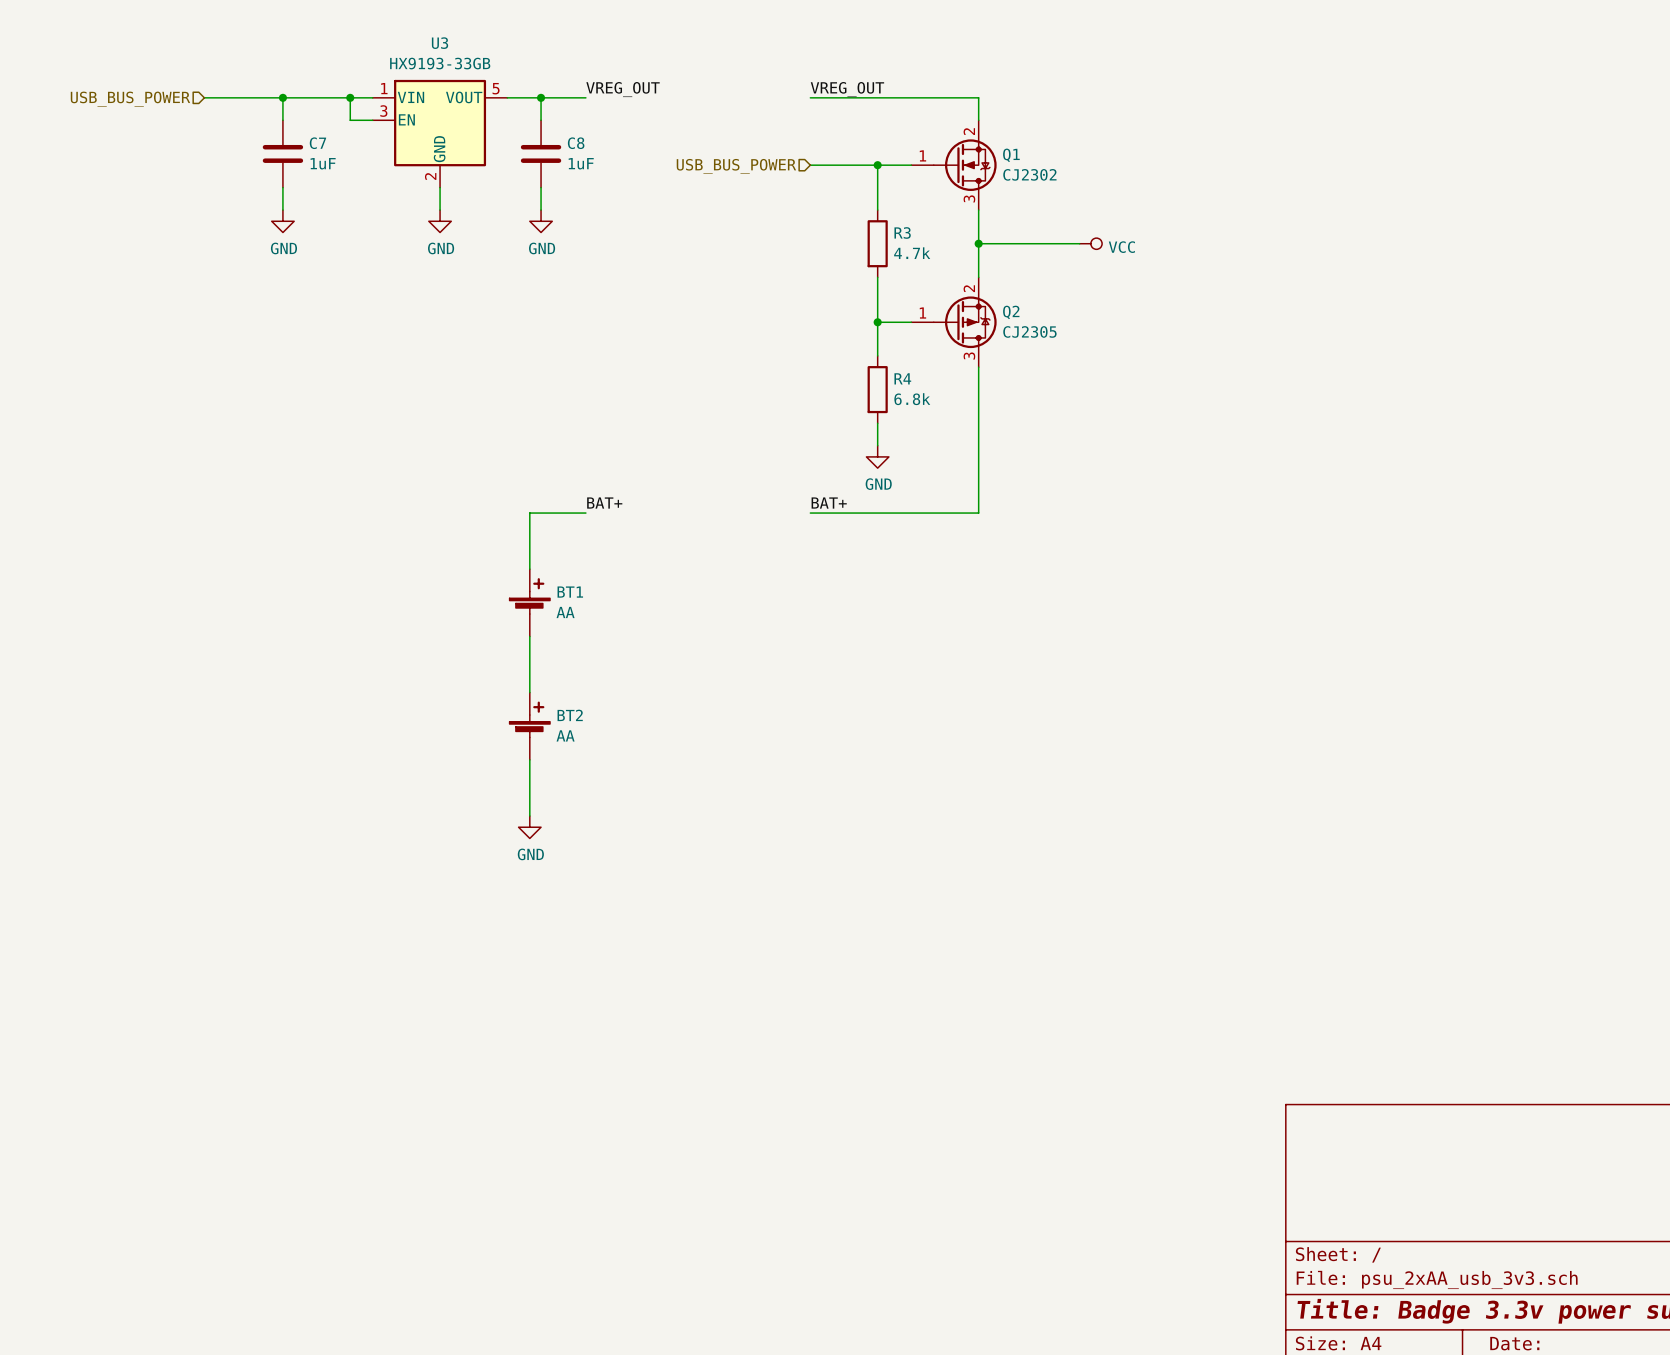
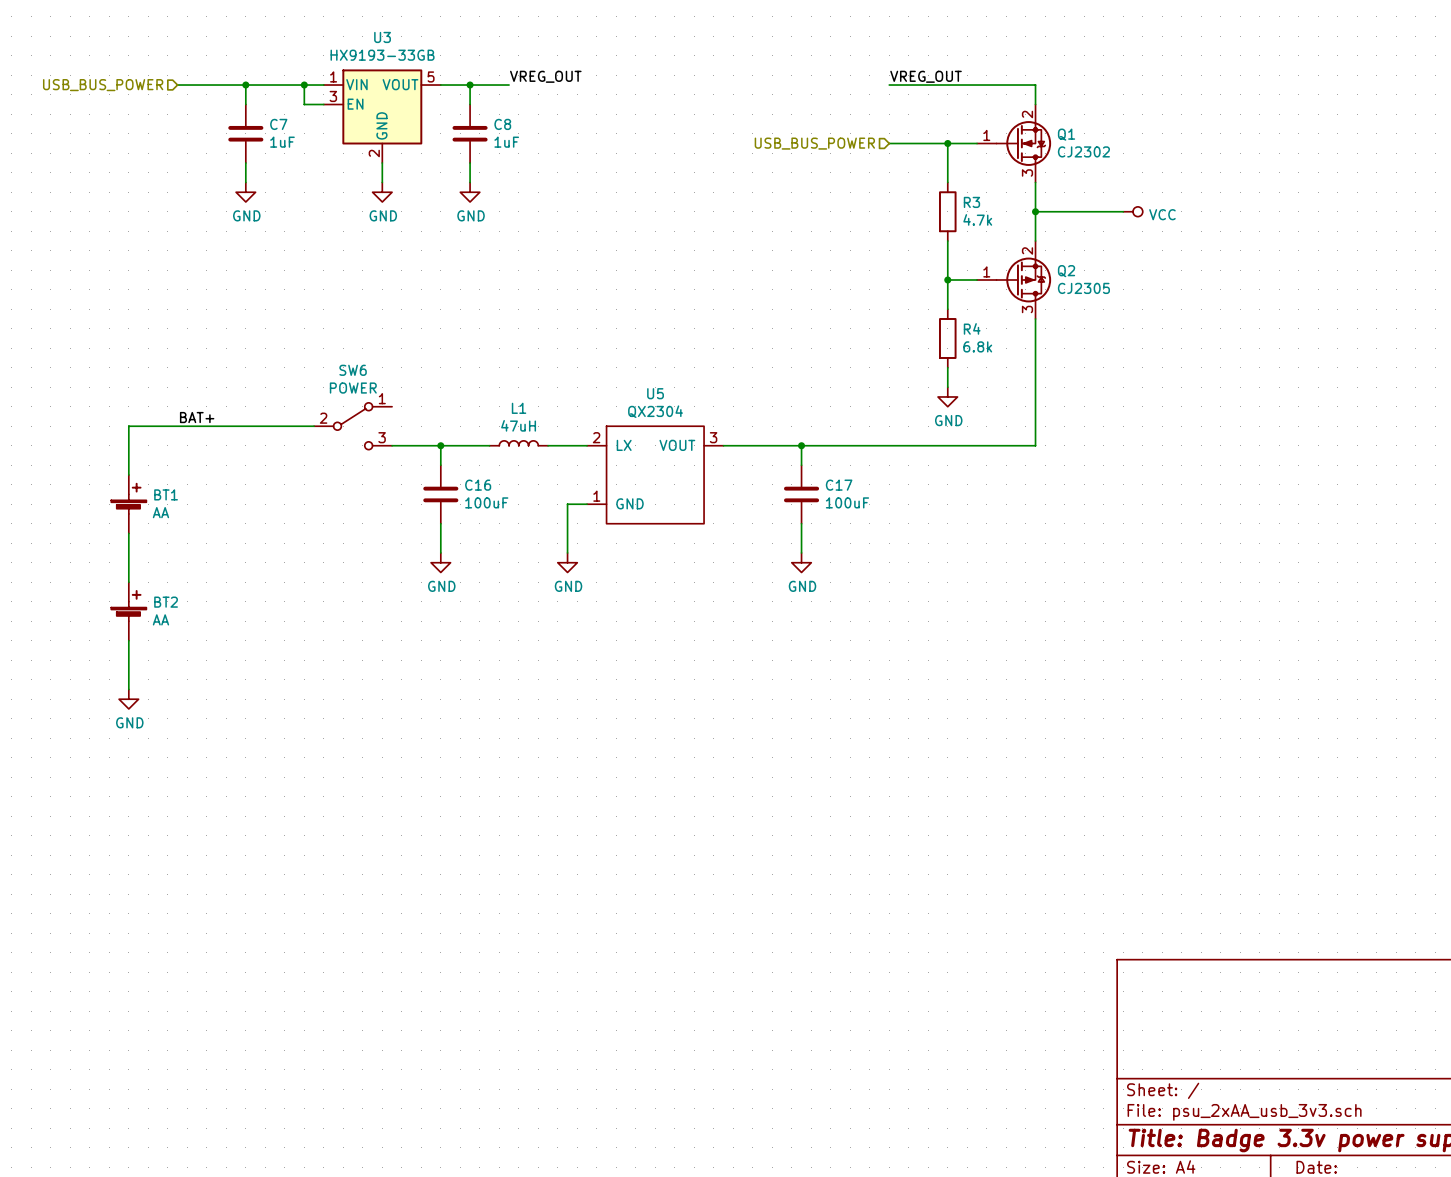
label position: VREG_OUT (847, 89) -> VREG_OUT (926, 76)
wire: (810, 97) (978, 97) (978, 120) -> (889, 85) (1035, 85) (1035, 104)
wire: (810, 165) (911, 165) -> (889, 143) (977, 143)
wire: (877, 165) (877, 210) -> (947, 143) (947, 182)
junction: (877, 165) -> none
Q1 position: (953, 165) -> (1014, 143)
junction: none -> (947, 143)
hierarchical label position: USB_BUS_POWER (736, 166) -> USB_BUS_POWER (814, 143)
wire: (978, 210) (978, 277) -> (1035, 182) (1035, 241)
R3 position: (877, 243) -> (947, 211)
wire: (978, 243) (1079, 243) -> (1035, 211) (1123, 211)
junction: (978, 243) -> none
power symbol position: VCC (1090, 243) -> VCC (1133, 211)
junction: none -> (1035, 211)
wire: (877, 277) (877, 355) -> (947, 241) (947, 309)
wire: (877, 322) (911, 322) -> (947, 279) (977, 279)
junction: (877, 322) -> none
Q2 position: (953, 322) -> (1014, 279)
junction: none -> (947, 279)
wire: (978, 367) (978, 513) -> (1035, 318) (1035, 445) (850, 445)
R4 position: (877, 389) -> (947, 338)
wire: (877, 423) (877, 445) -> (947, 367) (947, 387)
power symbol: GND (877, 456) -> none
power symbol: none -> GND (947, 396)
label: none -> BAT+ (197, 417)
wire: none -> (314, 426) (128, 426) (128, 474)
SW6: none -> POWER (353, 426)
label: BAT+ (604, 503) -> none
label: BAT+ (829, 503) -> none
L1: none -> 47uH (518, 443)
wire: none -> (440, 445) (440, 465)
junction: none -> (440, 445)
wire: (529, 513) (529, 569) -> (460, 445) (392, 445)
wire: none -> (548, 445) (587, 445)
wire: none -> (801, 445) (801, 465)
junction: none -> (801, 445)
U5: none -> QX2304 (655, 474)
C16: none -> 100uF (440, 494)
C17: none -> 100uF (801, 494)
wire: none -> (587, 504) (567, 504) (567, 552)
wire: none -> (440, 523) (440, 552)
BT1 position: (529, 602) -> (128, 504)
wire: none -> (801, 523) (801, 552)
wire: none -> (128, 533) (128, 582)
wire: (529, 636) (529, 692) -> none
power symbol: none -> GND (440, 562)
power symbol: none -> GND (567, 562)
power symbol: none -> GND (801, 562)
BT2 position: (529, 726) -> (128, 611)
wire: none -> (128, 640) (128, 689)
wire: (529, 759) (529, 816) -> none
power symbol: none -> GND (128, 699)
power symbol: GND (529, 827) -> none

